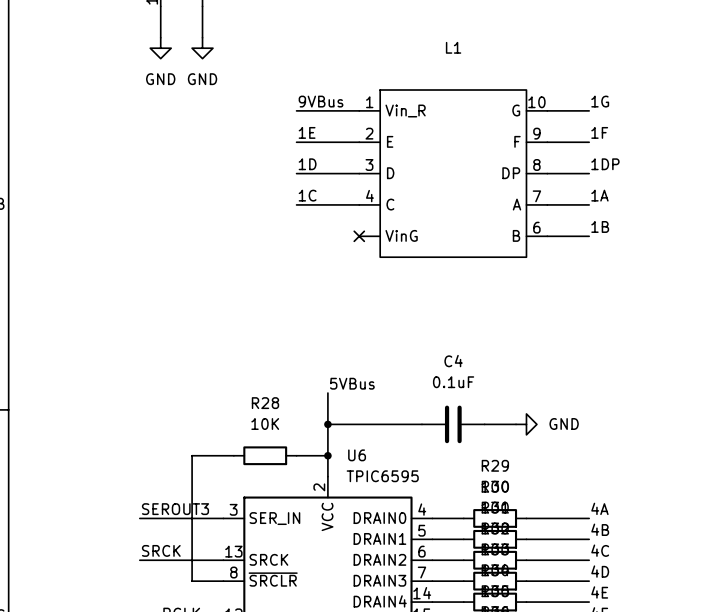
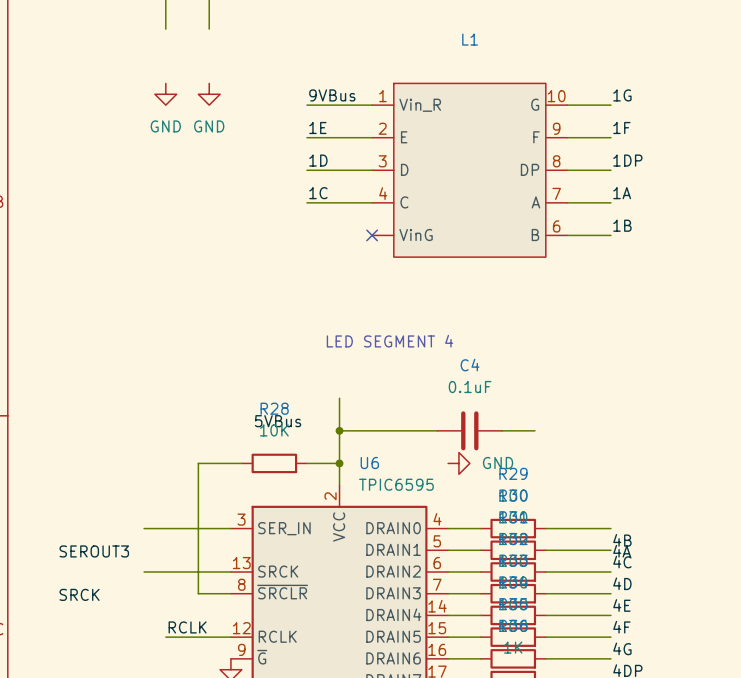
power symbol: GND (160, 48) -> none
power symbol: GND (202, 48) -> none
power symbol: none -> GND (165, 94)
power symbol: none -> GND (209, 94)
text: none -> LED SEGMENT 4 (389, 341)
label position: 5VBus (352, 383) -> 5VBus (278, 421)
power symbol position: GND (526, 424) -> GND (458, 463)
label position: 4A (599, 508) -> 4A (622, 551)
label position: SEROUT3 (175, 509) -> SEROUT3 (94, 551)
label position: SRCK (161, 550) -> SRCK (79, 594)

